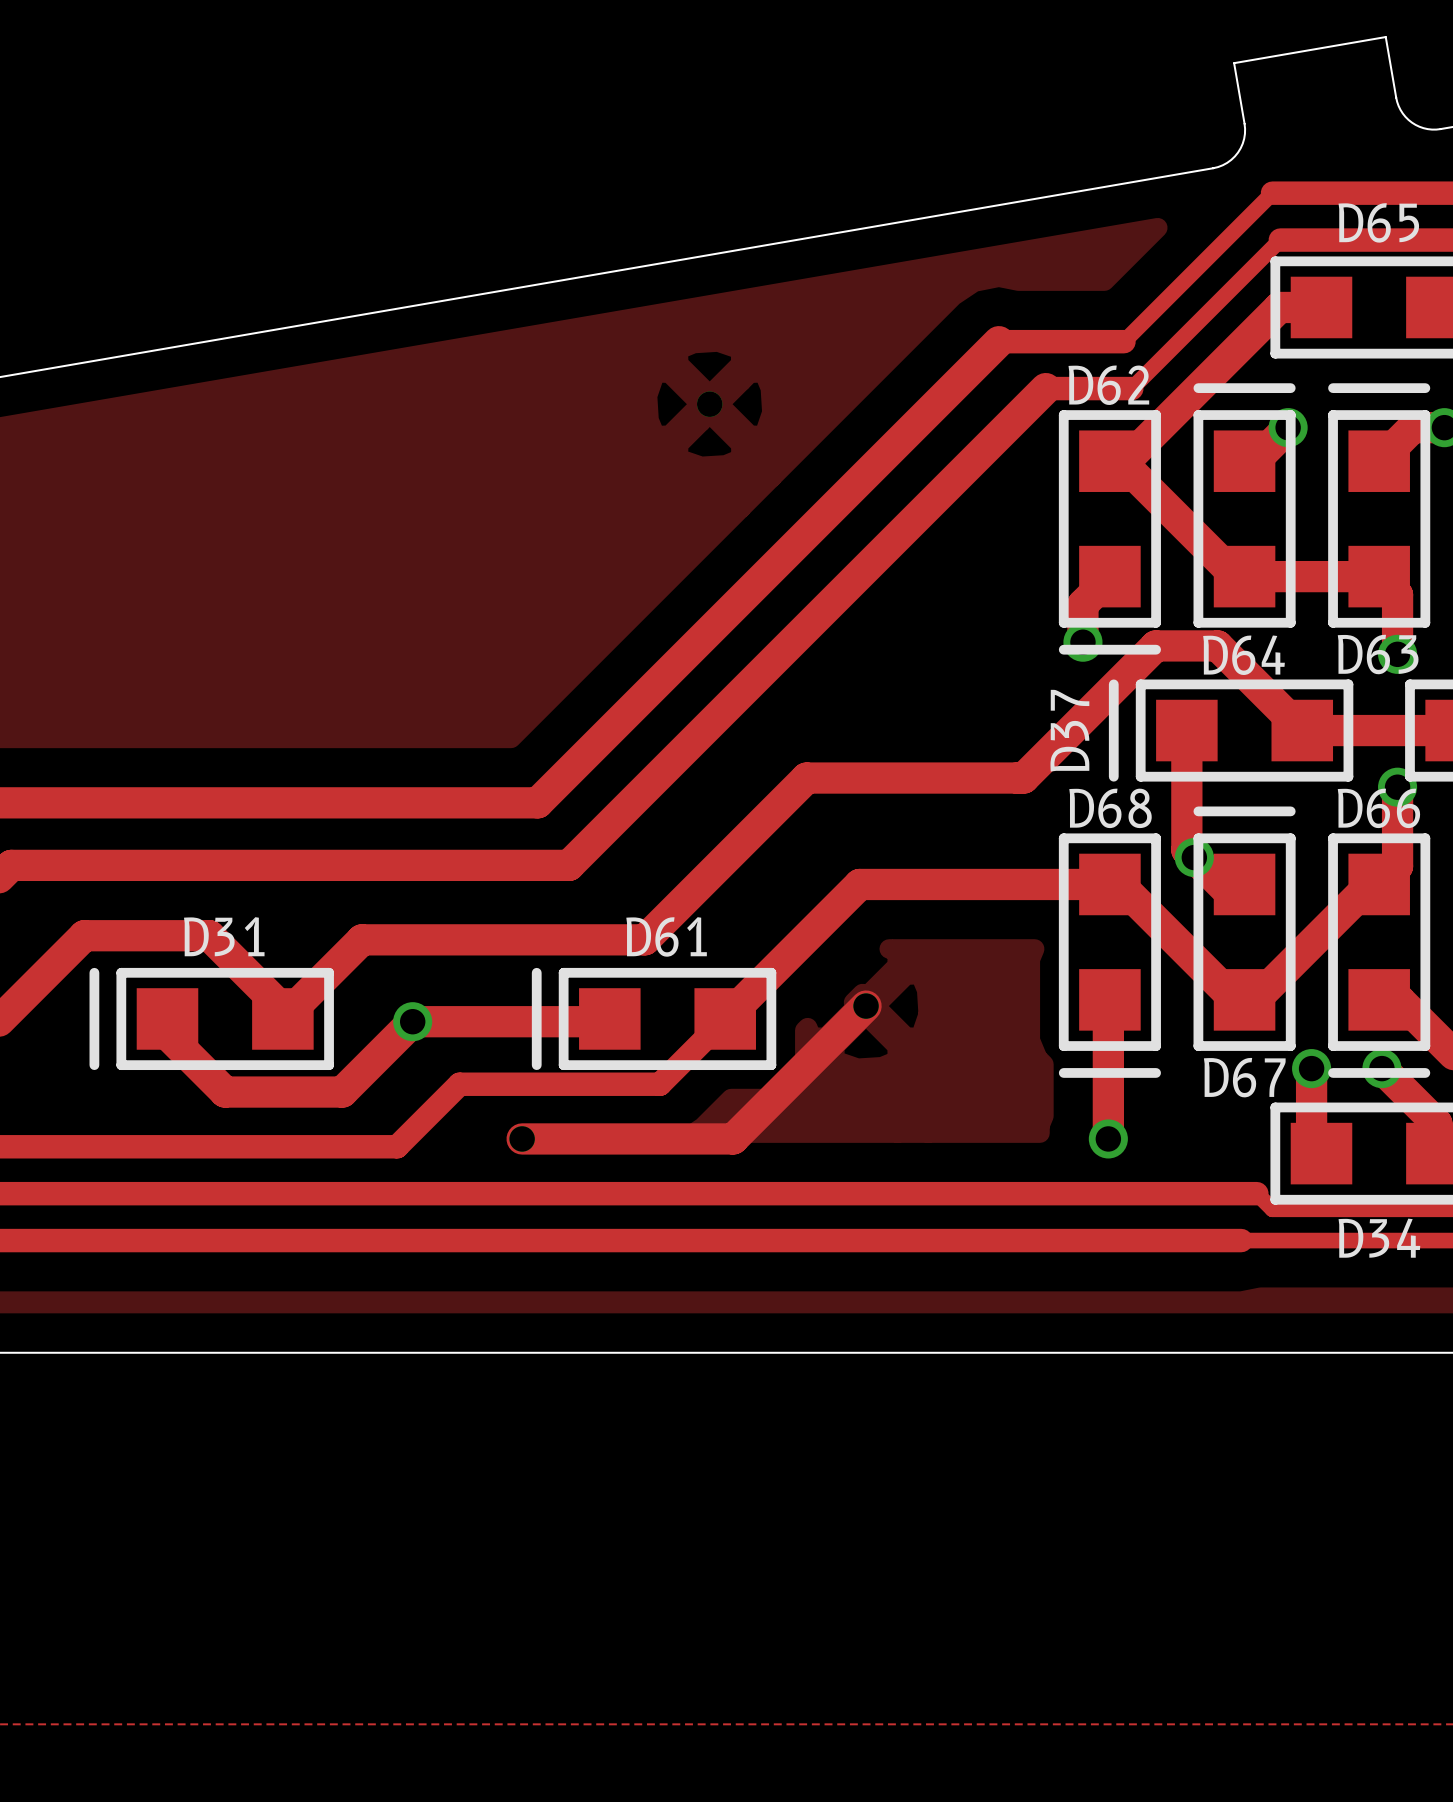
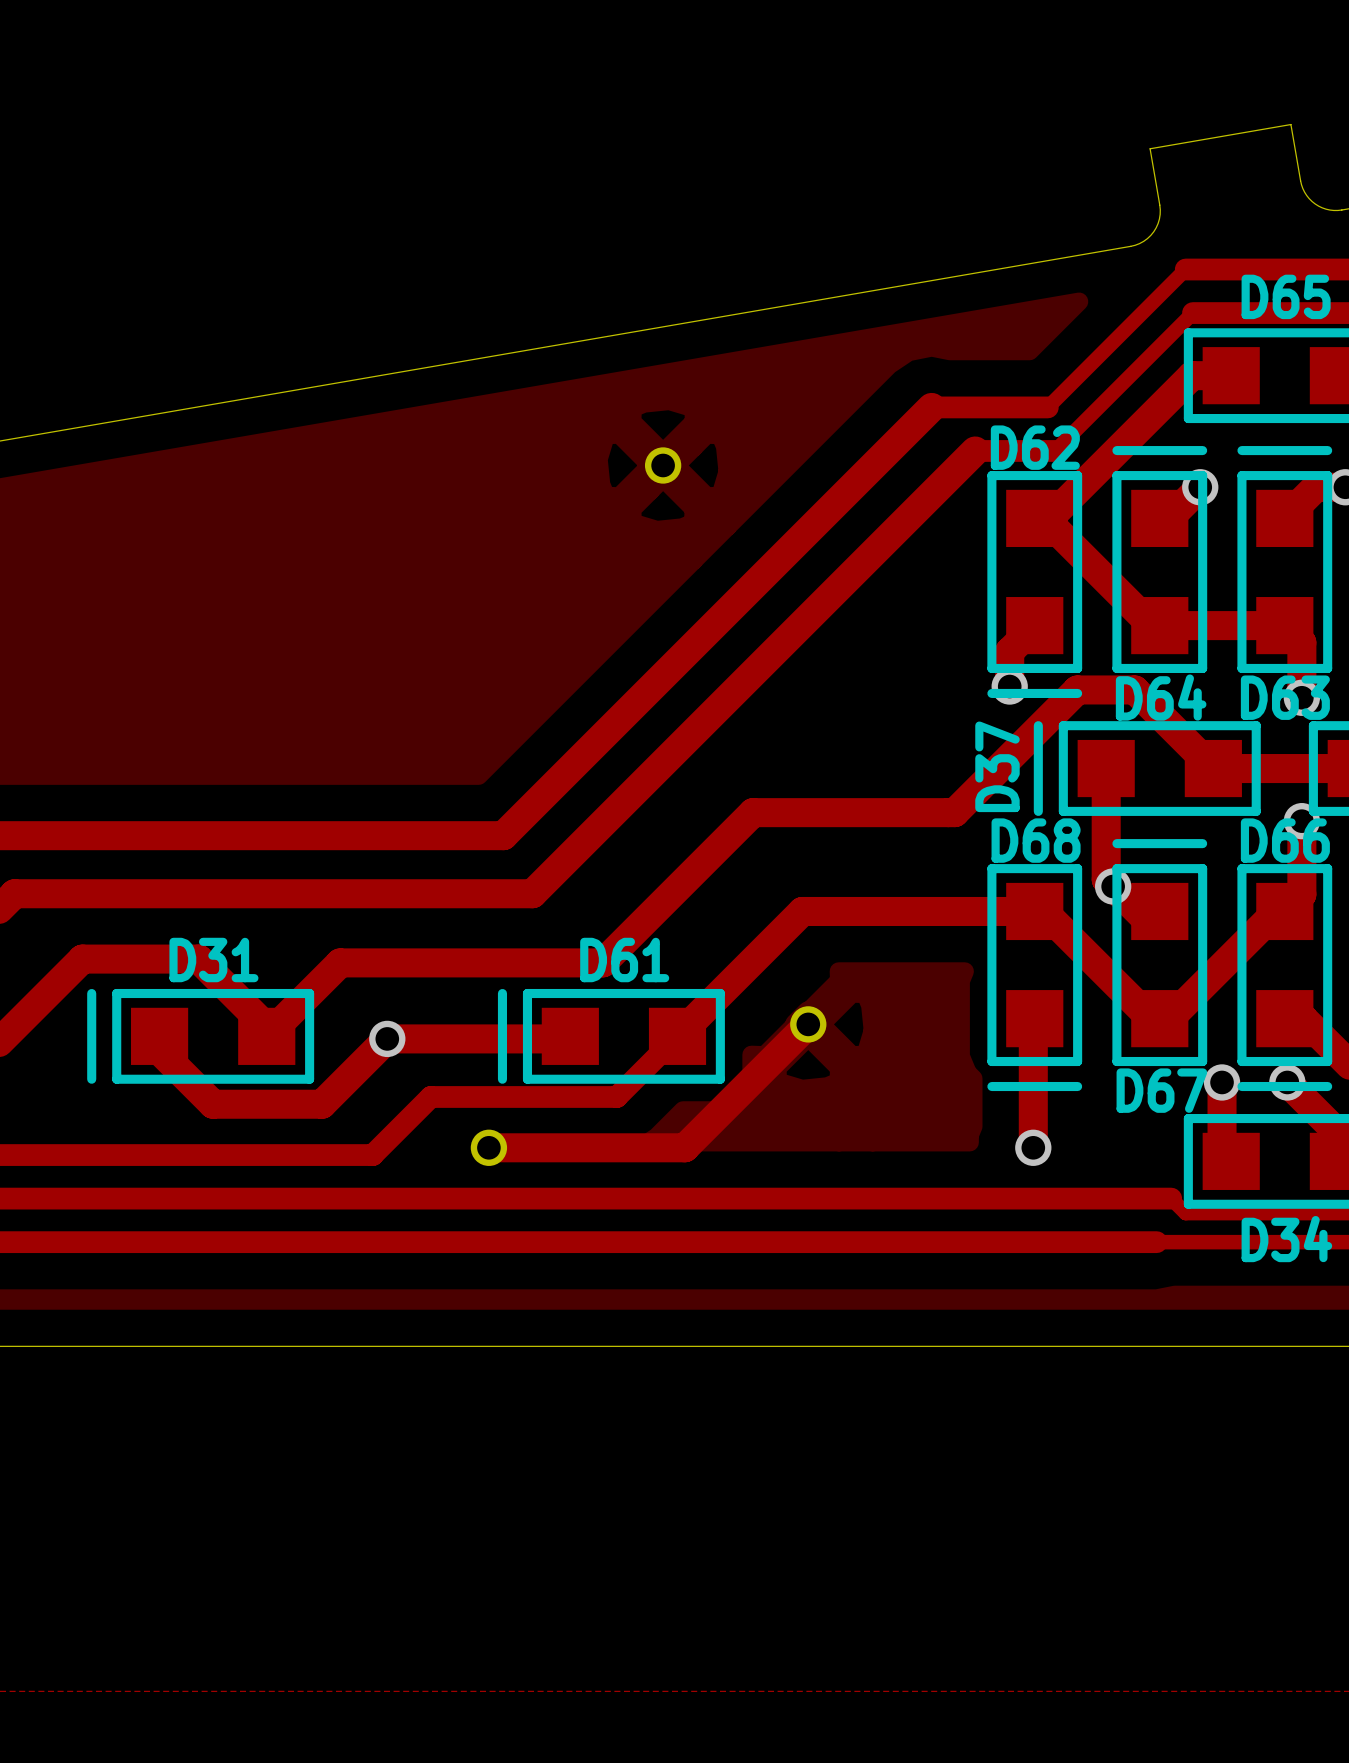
part footprint: [697, 391, 723, 417] -> [644, 447, 682, 484]
part footprint: [853, 993, 879, 1019] -> [790, 1006, 827, 1043]
part footprint: [509, 1126, 535, 1152] -> [470, 1129, 508, 1166]

